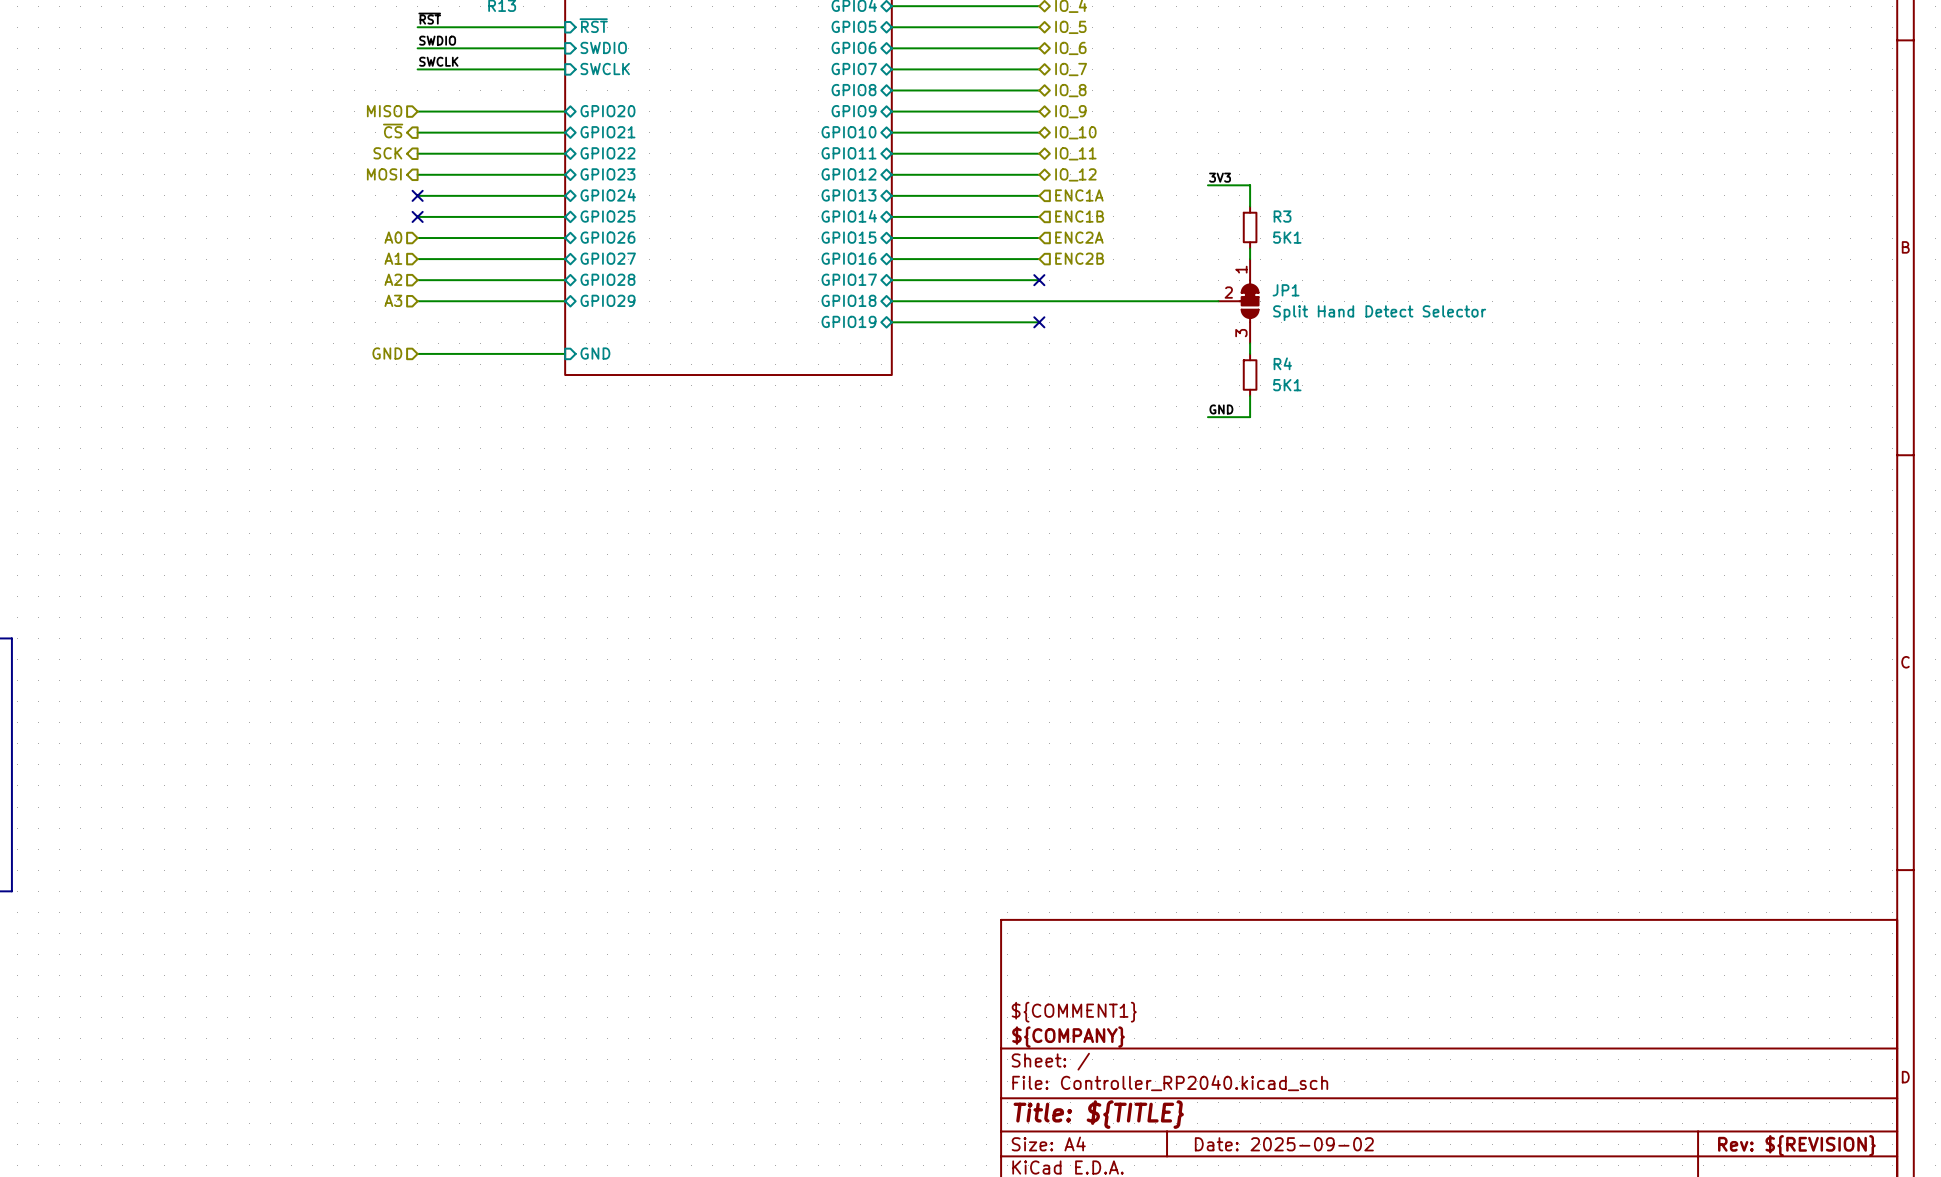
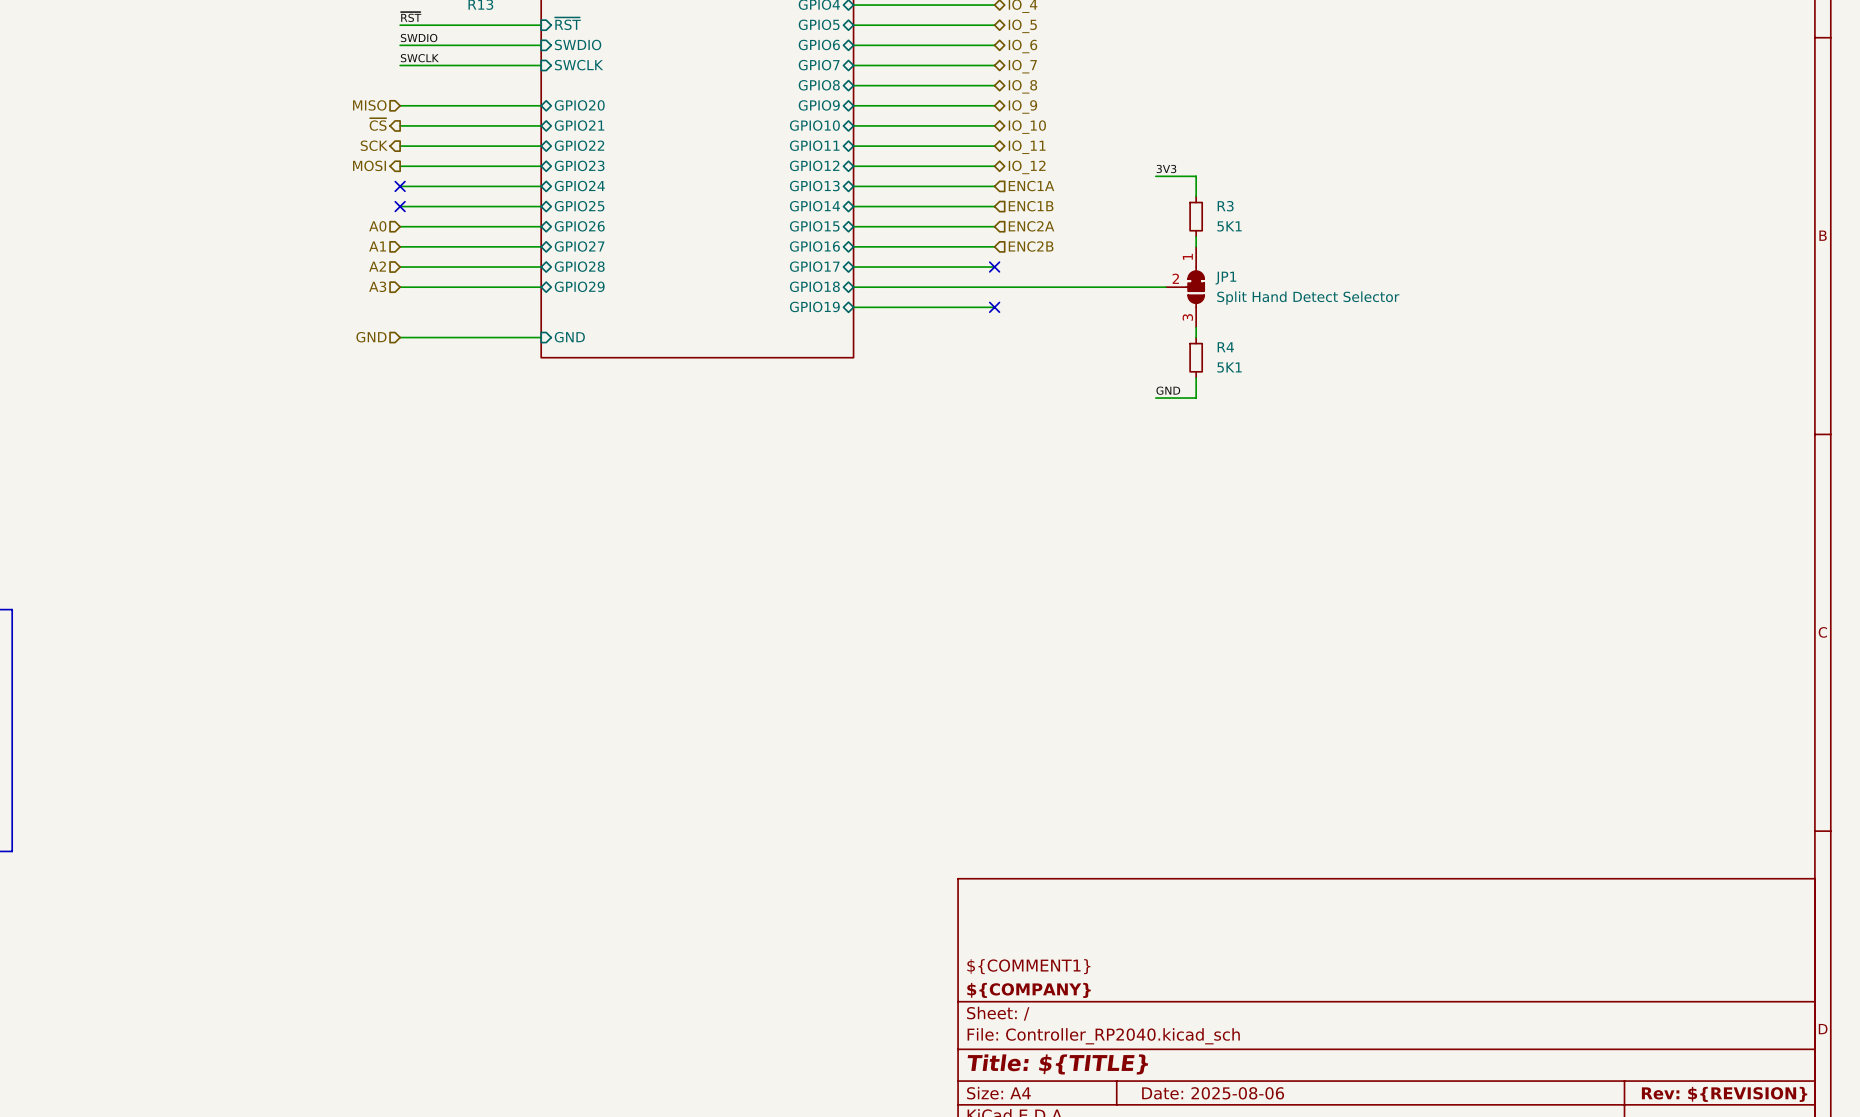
title block: Date: 2025-09-02 (1284, 1144) -> Date: 2025-08-06 (1213, 1093)

